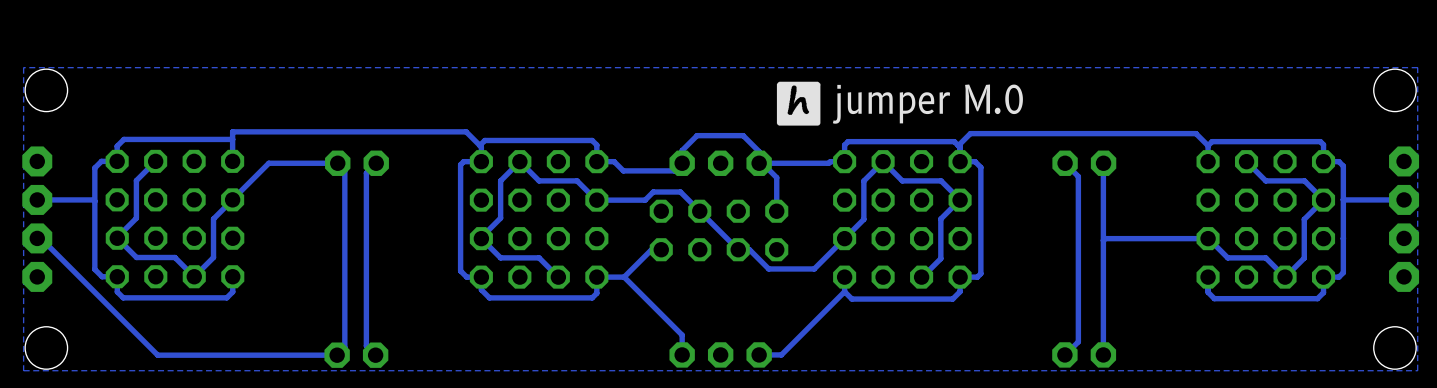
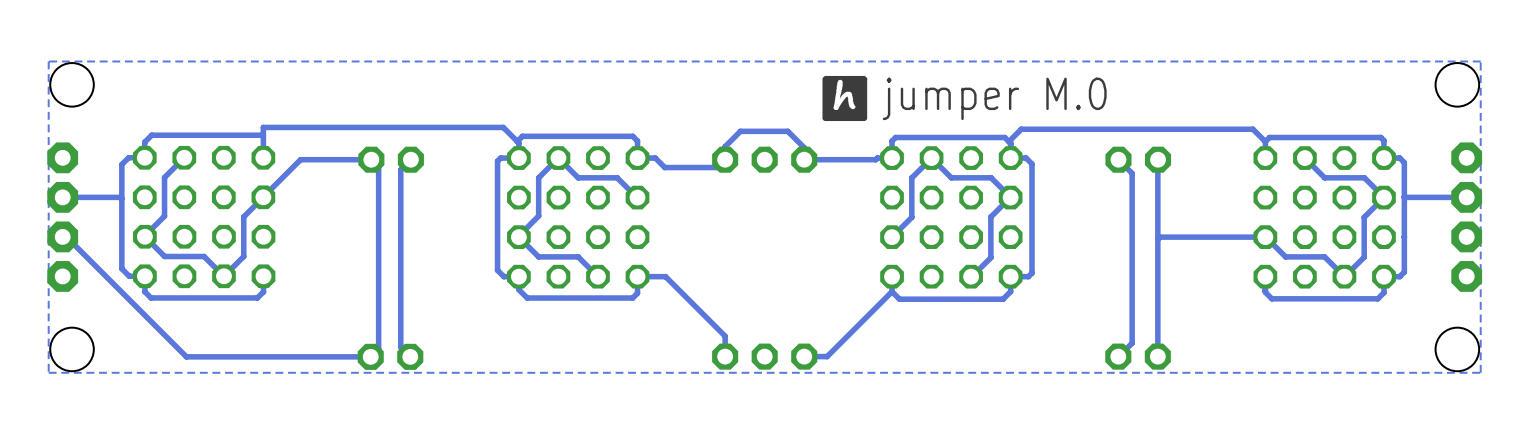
track: (759, 160) (776, 177) (776, 211) -> none
track: (596, 200) (645, 200) (653, 192) (680, 192) (738, 249) (749, 249) (768, 268) (814, 268) (844, 238) -> none
part: (719, 230) -> none
track: (661, 249) (651, 249) (624, 277) -> none

